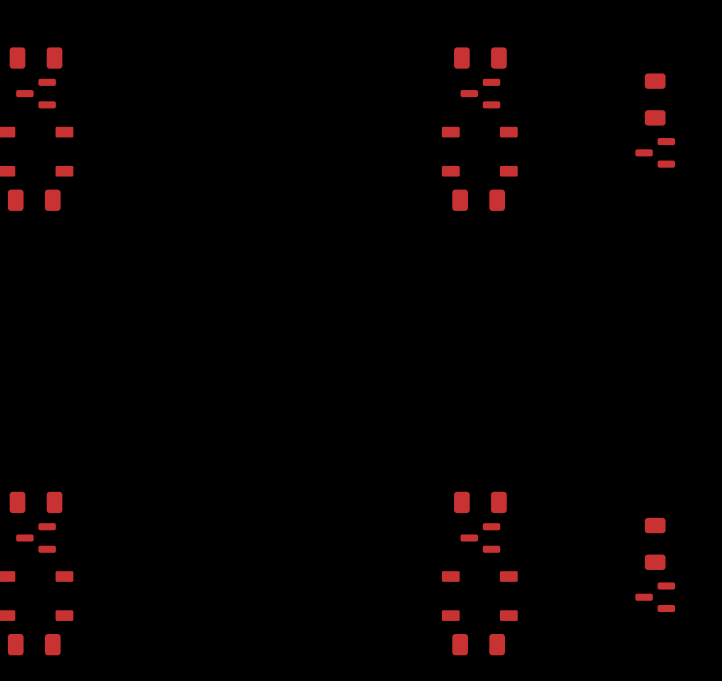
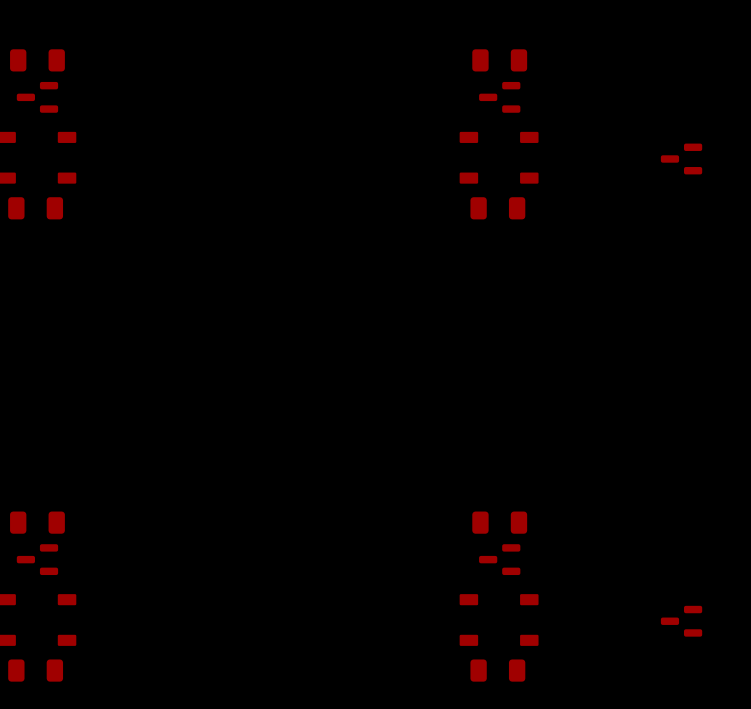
part: (655, 99) -> none
part: (655, 543) -> none

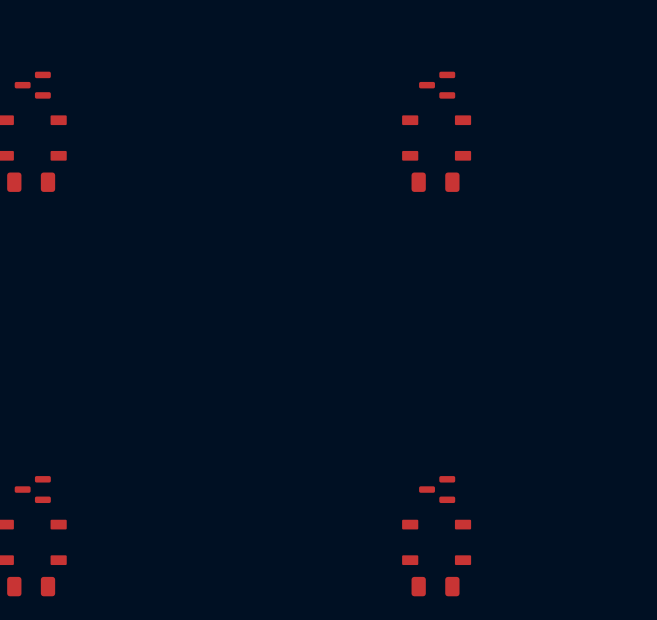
part: (37, 60) -> none
part: (499, 60) -> none
part: (681, 158) -> none
part: (37, 522) -> none
part: (499, 522) -> none
part: (681, 621) -> none

